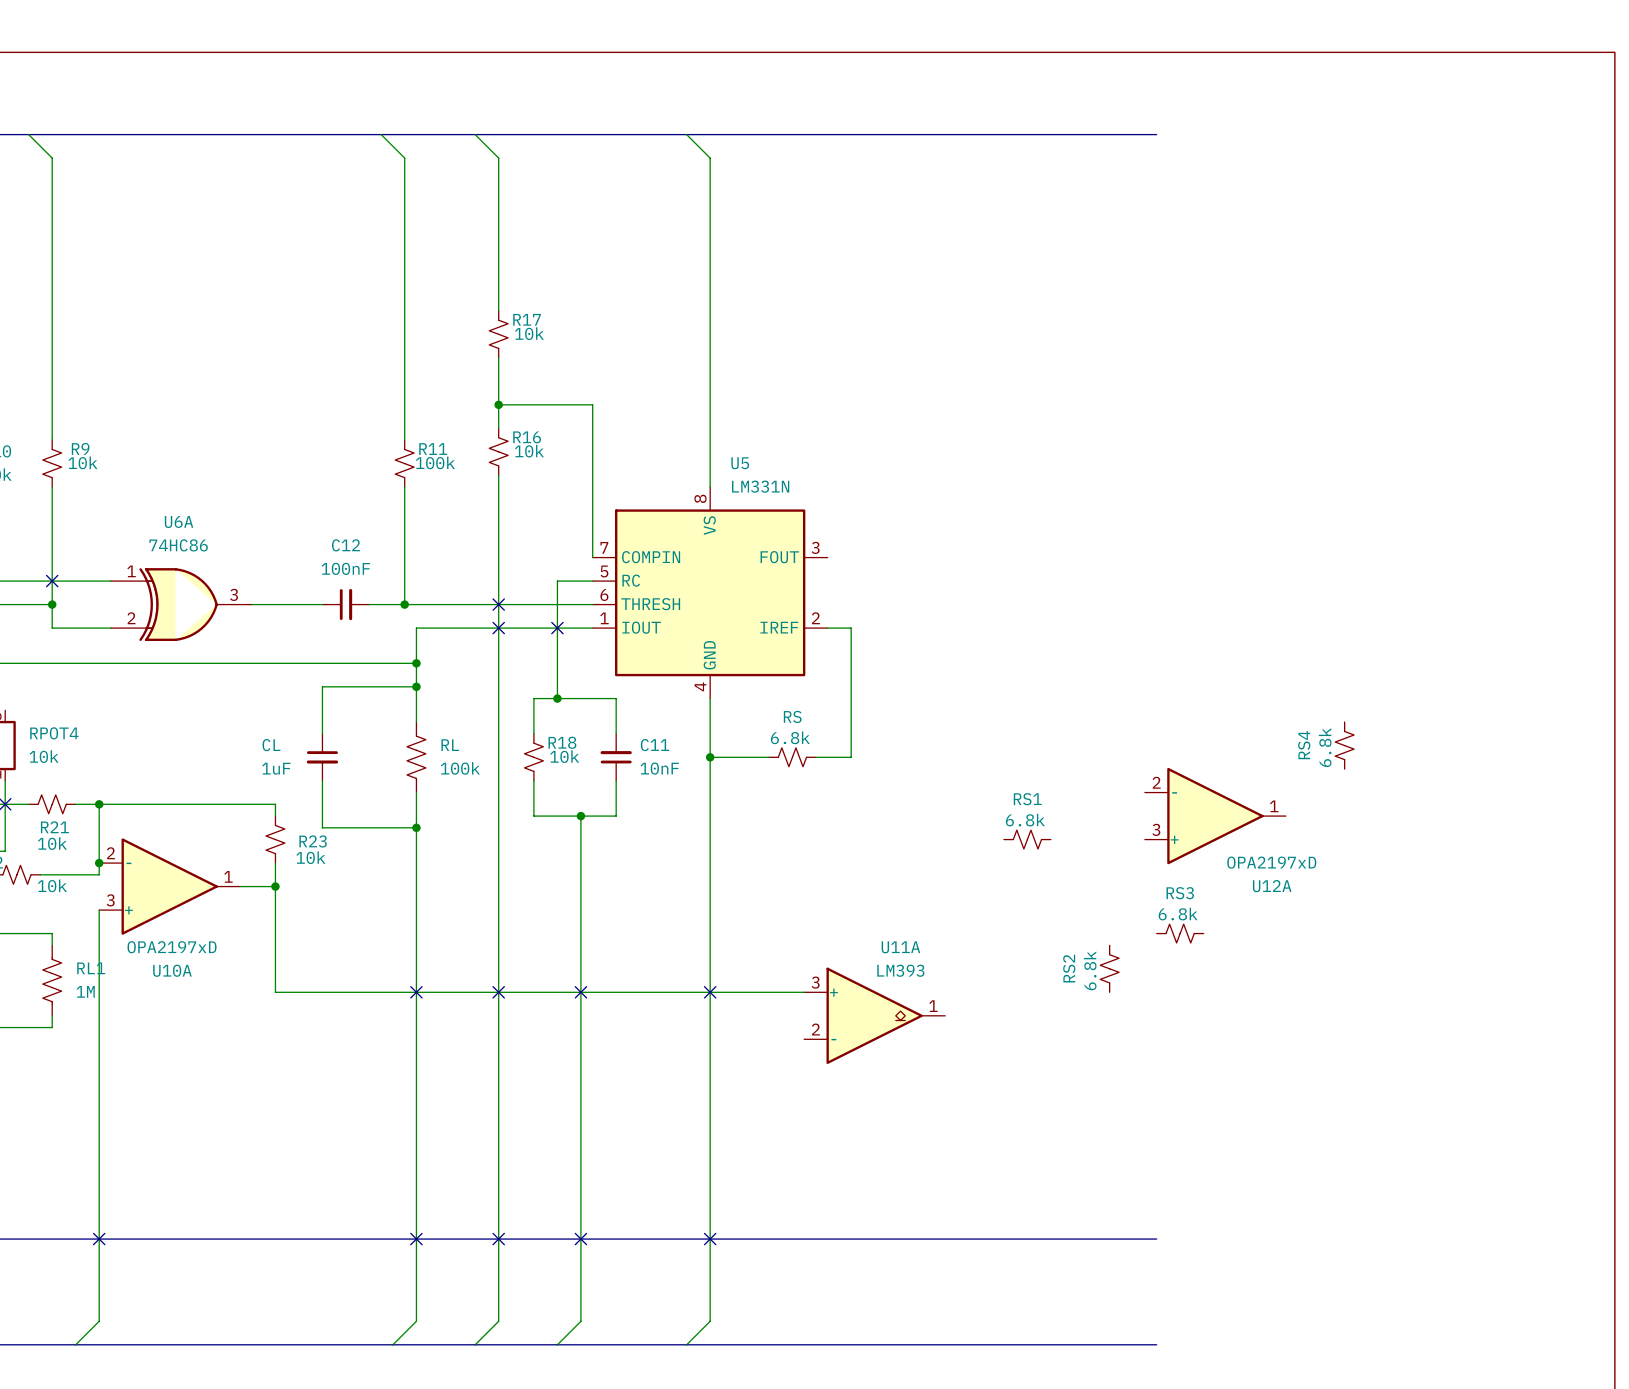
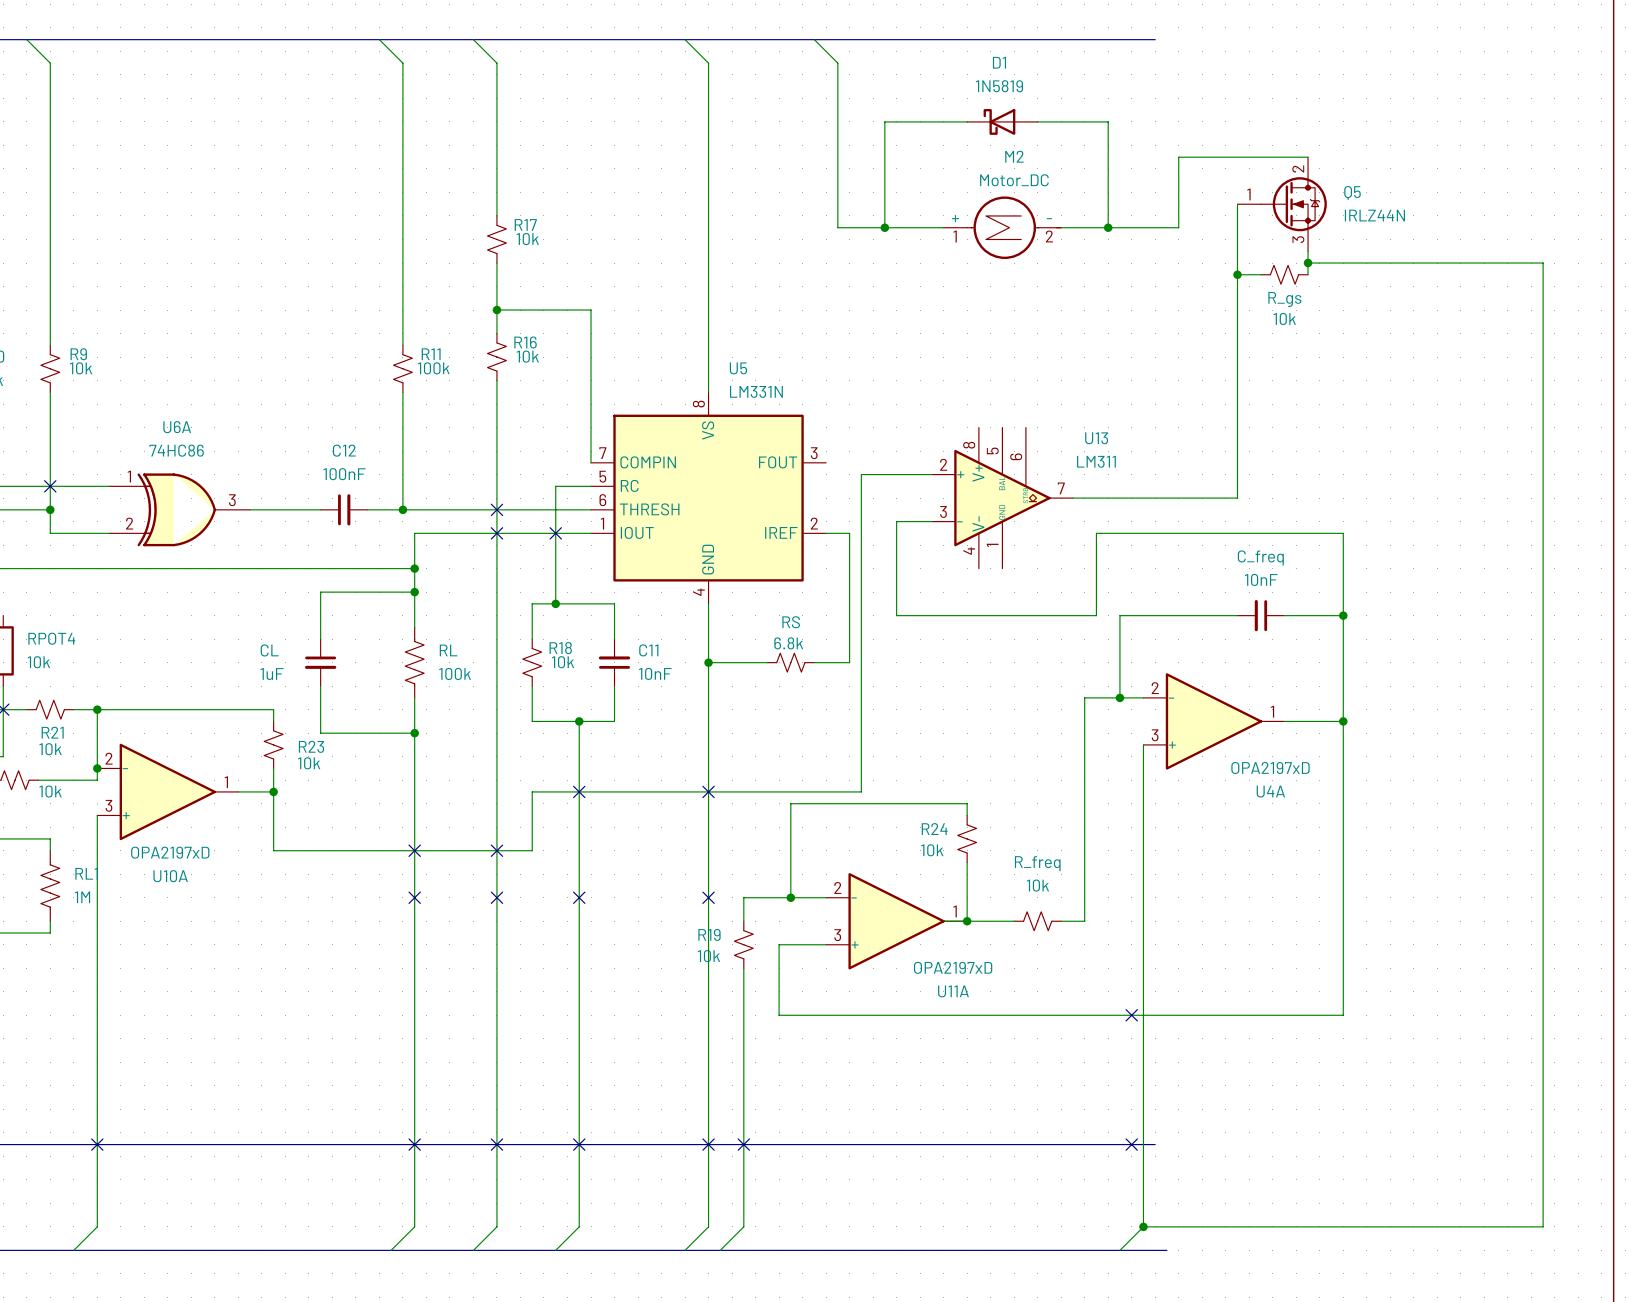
wire: none -> (814, 39) (837, 63) (837, 227) (943, 227)
wire: none -> (967, 121) (884, 121) (884, 227)
D1: none -> 1N5819 (1002, 121)
wire: none -> (1037, 121) (1108, 121) (1108, 227)
wire: none -> (1308, 157) (1178, 157) (1178, 227) (1061, 227)
wire: none -> (1237, 204) (1237, 498) (1072, 498)
Q5: none -> IRLZ44N (1282, 204)
junction: none -> (884, 227)
M2: none -> Motor_DC (1002, 227)
junction: none -> (1108, 227)
wire: none -> (1308, 251) (1308, 274)
wire: none -> (1308, 263) (1543, 263) (1543, 1226) (1143, 1226)
junction: none -> (1308, 263)
wire: none -> (1237, 274) (1261, 274)
junction: none -> (1237, 274)
R_gs: none -> 10k (1284, 274)
U13: none -> LM311 (1002, 498)
wire: none -> (931, 521) (896, 521) (896, 615) (1096, 615) (1096, 533) (1343, 533) (1343, 1015) (779, 1015) (779, 944) (826, 944)
wire: none -> (1237, 615) (1119, 615) (1119, 697)
C_freq: none -> 10nF (1261, 615)
wire: none -> (1284, 615) (1343, 615)
junction: none -> (1343, 615)
RS4: 6.8k (1344, 745) -> none
junction: none -> (1119, 697)
wire: none -> (1143, 697) (1084, 697) (1084, 921) (1061, 921)
wire: none -> (1284, 721) (1343, 721)
junction: none -> (1343, 721)
RS1: 6.8k (1027, 839) -> none
wire: none -> (1143, 744) (1143, 1226)
no-connect mark: none -> (579, 791)
no-connect mark: none -> (708, 791)
U12A name: U12A (1272, 886) -> U4A (1270, 791)
wire: none -> (967, 815) (967, 803) (790, 803) (790, 897)
R24: none -> 10k (967, 838)
RS3: 6.8k (1180, 933) -> none
wire: (275, 945) (275, 992) (745, 992) -> (273, 850) (532, 850) (532, 791) (861, 791) (861, 474) (931, 474)
no-connect mark: none -> (414, 850)
no-connect mark: none -> (496, 850)
U11A name position: U11A (900, 947) -> U11A (953, 991)
wire: none -> (967, 862) (967, 921)
U11A symbol: [804, 967, 946, 1064] -> [826, 873, 968, 970]
RS2: 6.8k (1109, 968) -> none
U11A value: LM393 (900, 970) -> OPA2197xD (953, 967)
wire: none -> (743, 897) (743, 921)
junction: none -> (790, 897)
wire: none -> (943, 921) (1014, 921)
junction: none -> (967, 921)
R_freq: none -> 10k (1037, 921)
R19: none -> 10k (743, 944)
wire: none -> (743, 968) (743, 1226) (720, 1250)
no-connect mark: none -> (1131, 1015)
no-connect mark: none -> (743, 1144)
no-connect mark: none -> (1131, 1144)
wire: none -> (1143, 1226) (1119, 1250)
junction: none -> (1143, 1226)
bus: none -> (1155, 1250) (1166, 1250)

